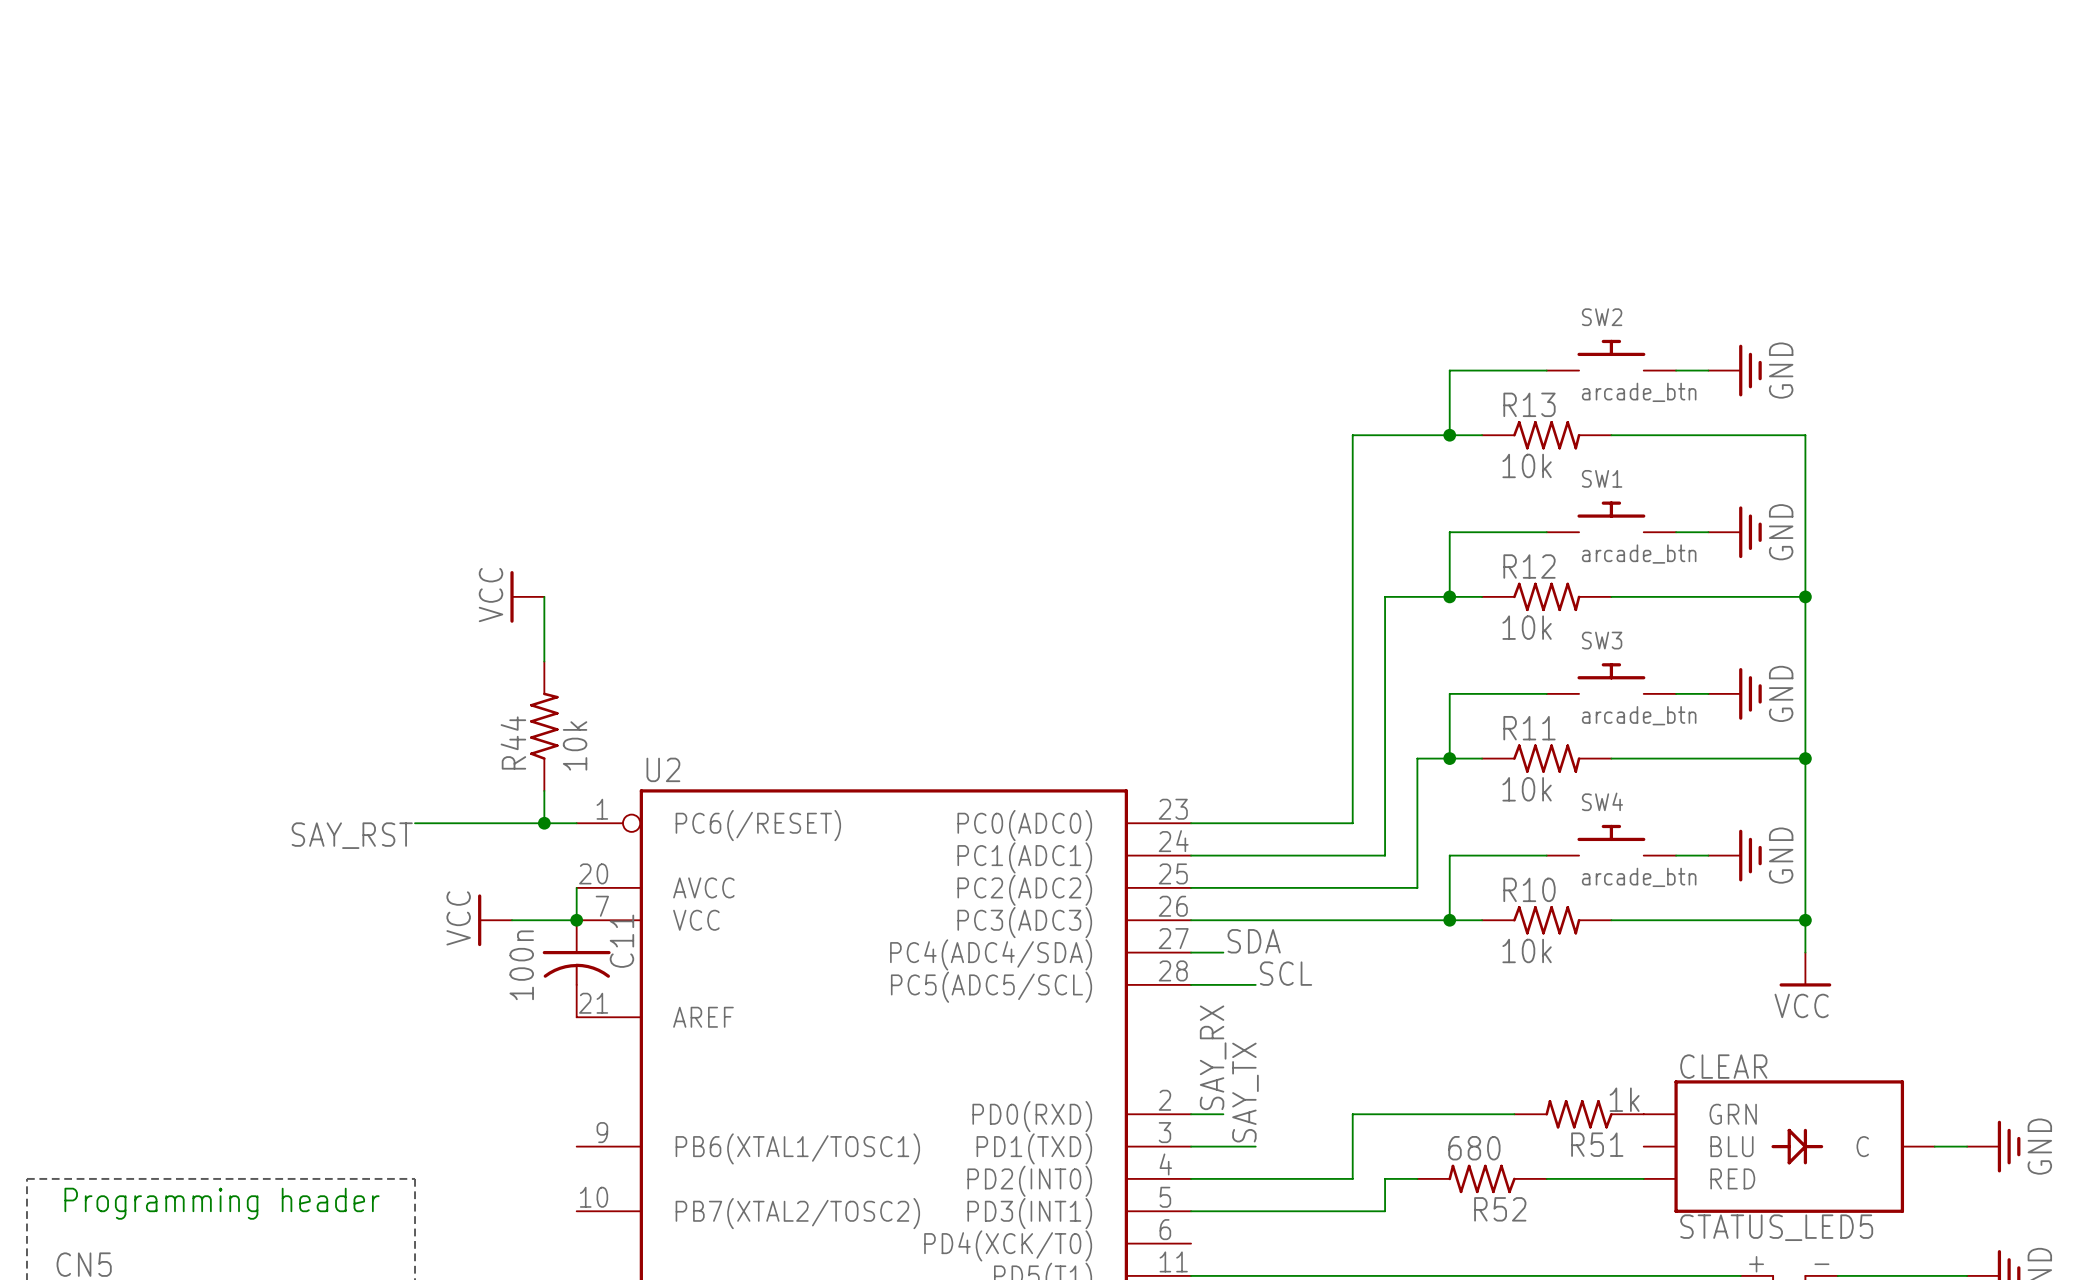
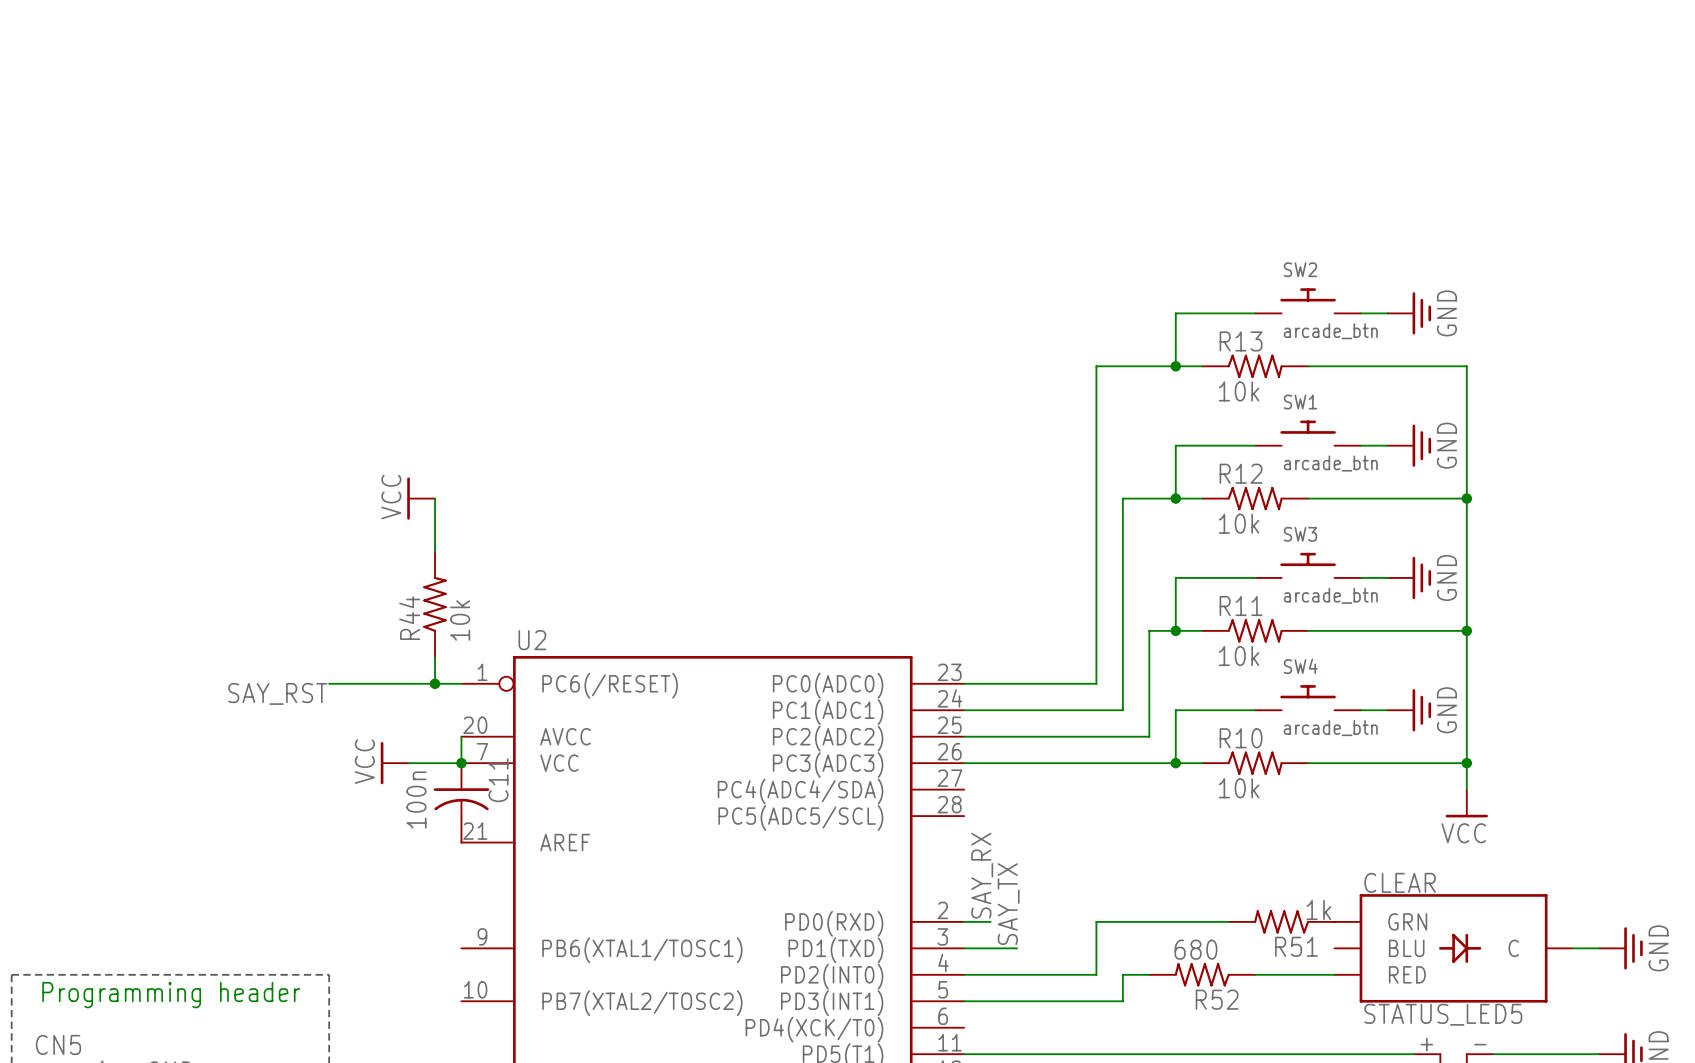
label: SDA (1254, 941) -> none
wire: (1191, 952) (1223, 952) -> none
label: SCL (1286, 973) -> none
wire: (1191, 984) (1255, 984) -> none

